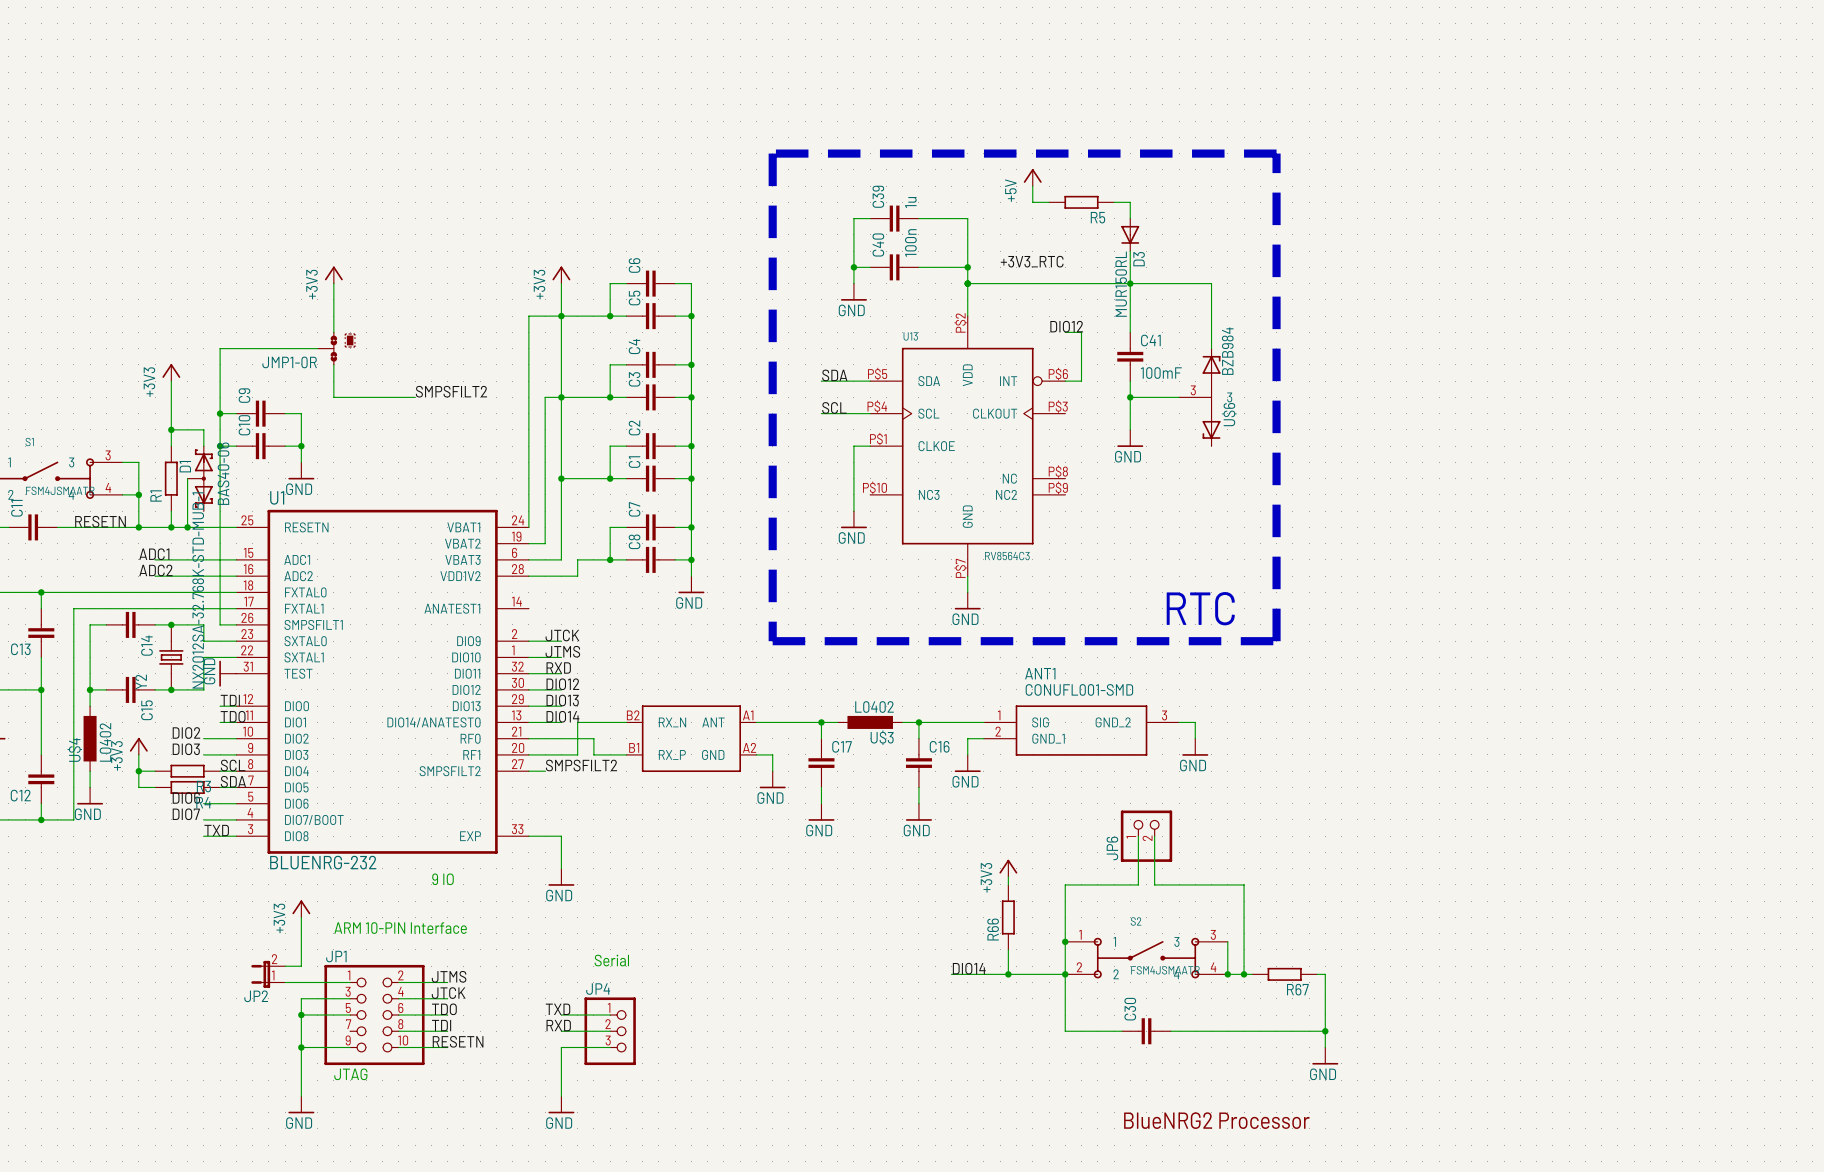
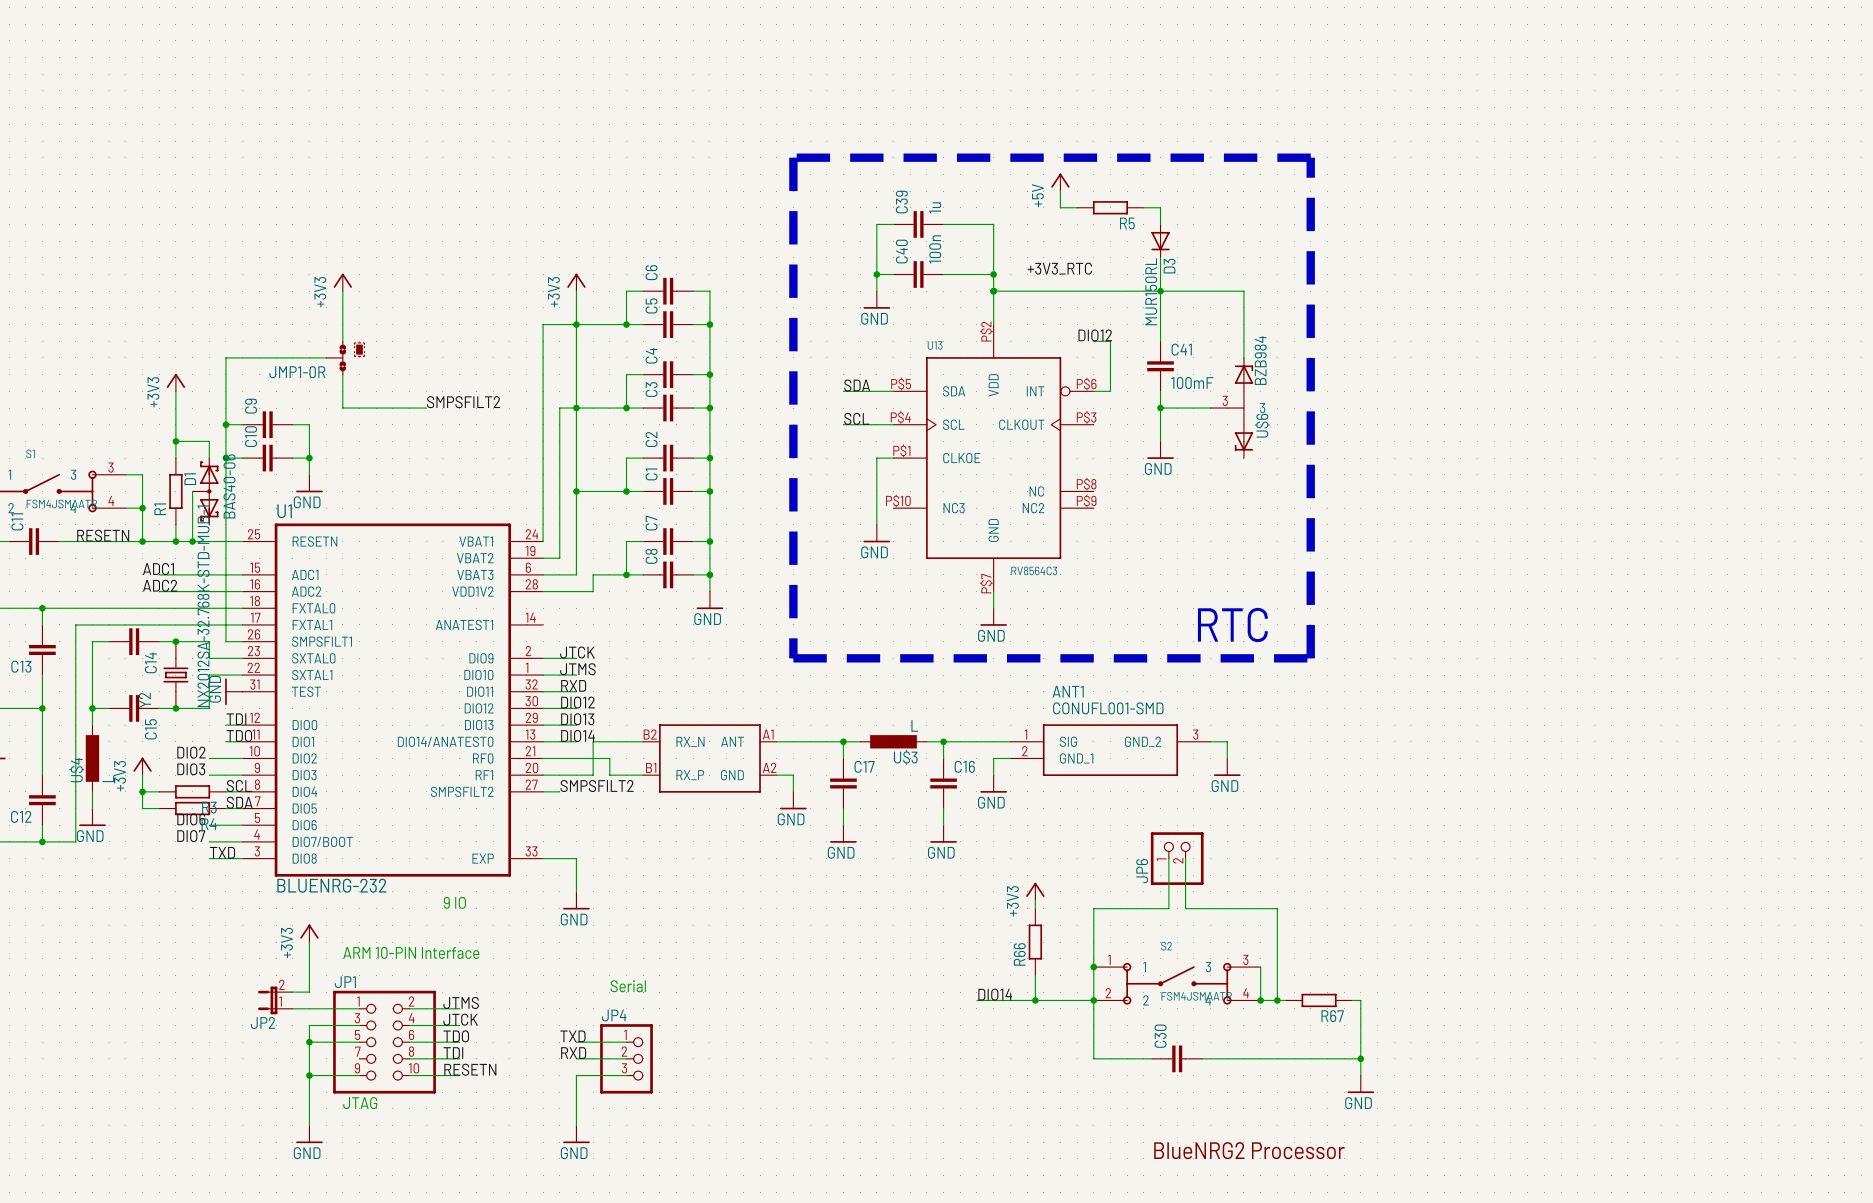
U$3 value: L0402 (874, 707) -> L (914, 725)
U$4 value: L0402 (105, 742) -> L (108, 778)

